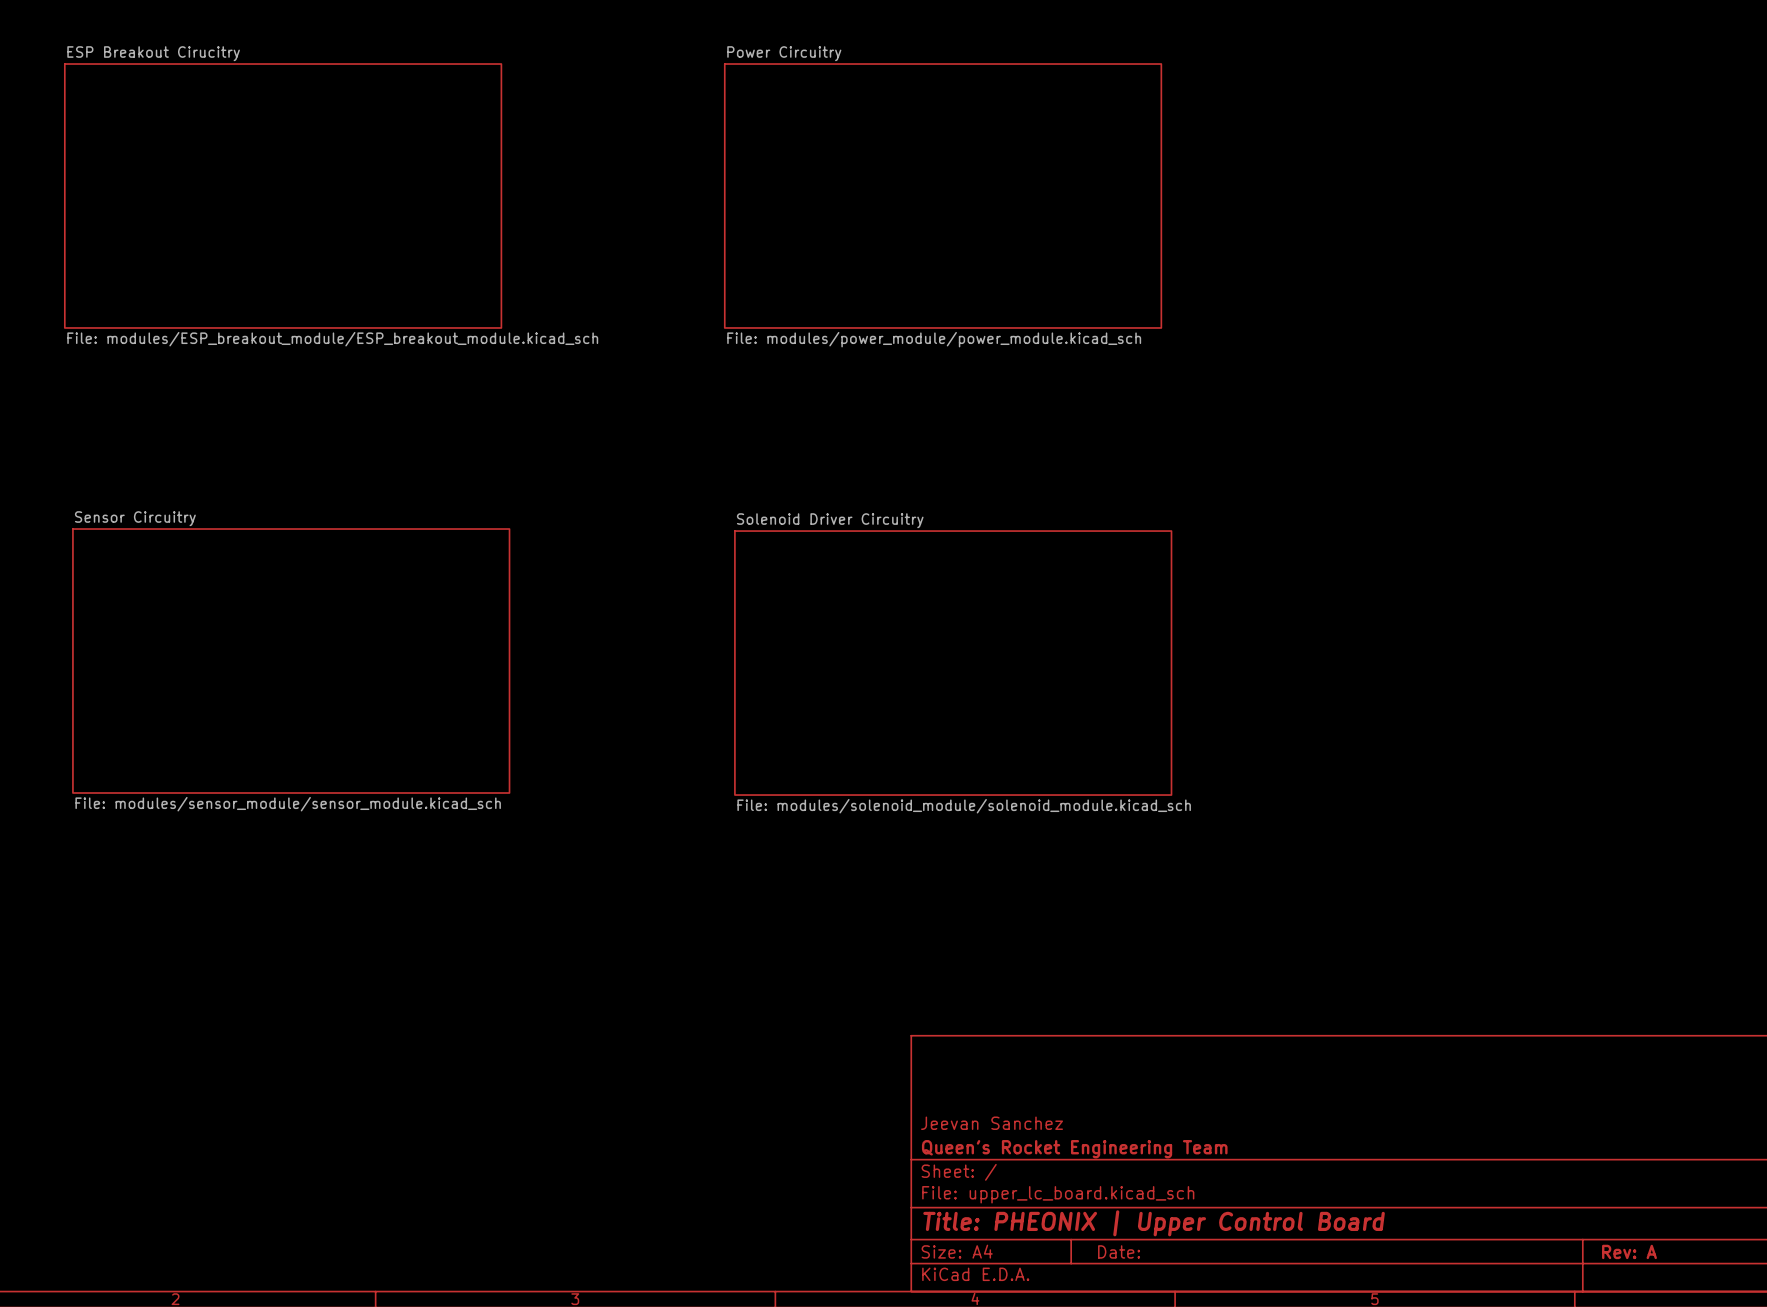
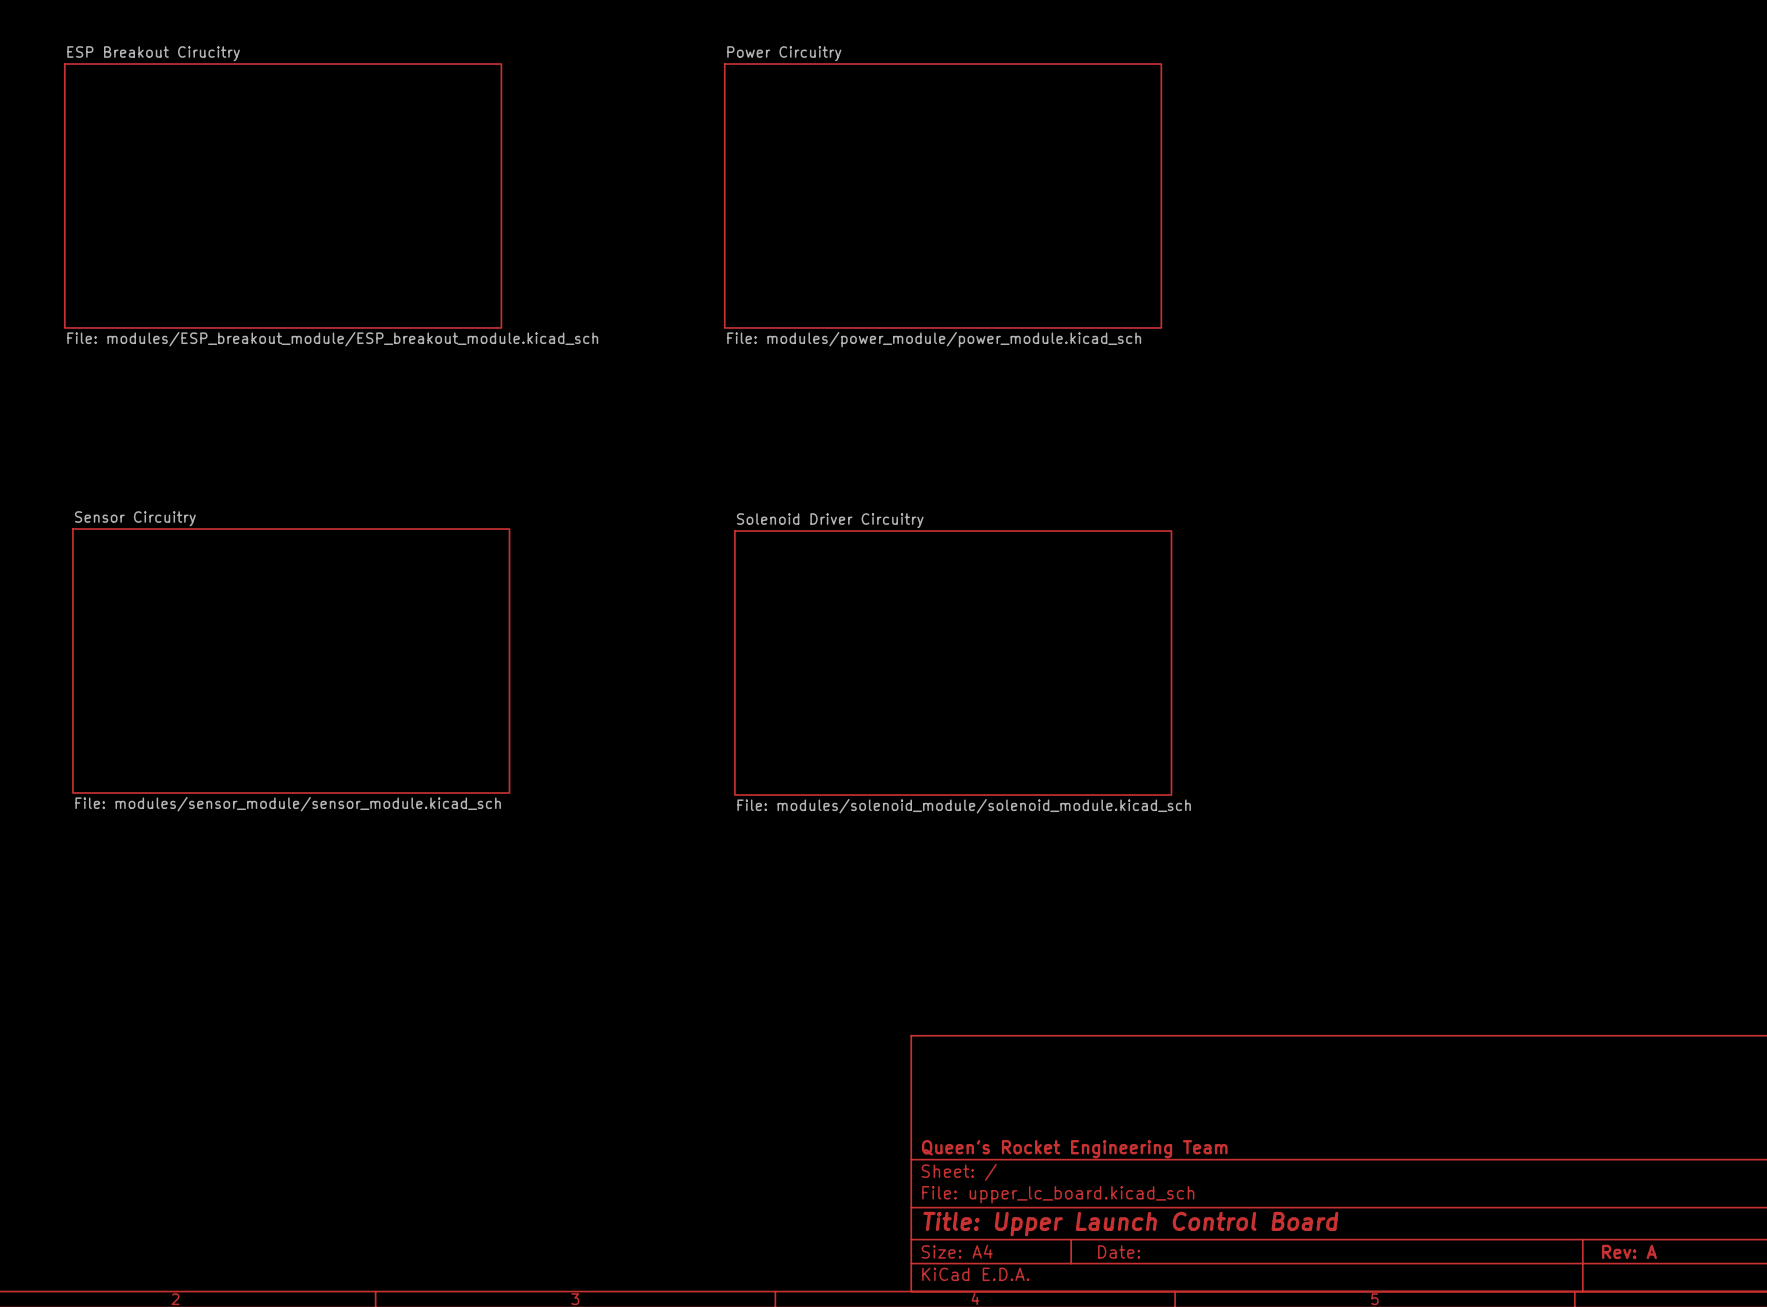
title block: Jeevan Sanchez (992, 1123) -> none
title block: Title: PHEONIX | Upper Control Board (1154, 1223) -> Title: Upper Launch Control Board (1130, 1224)

